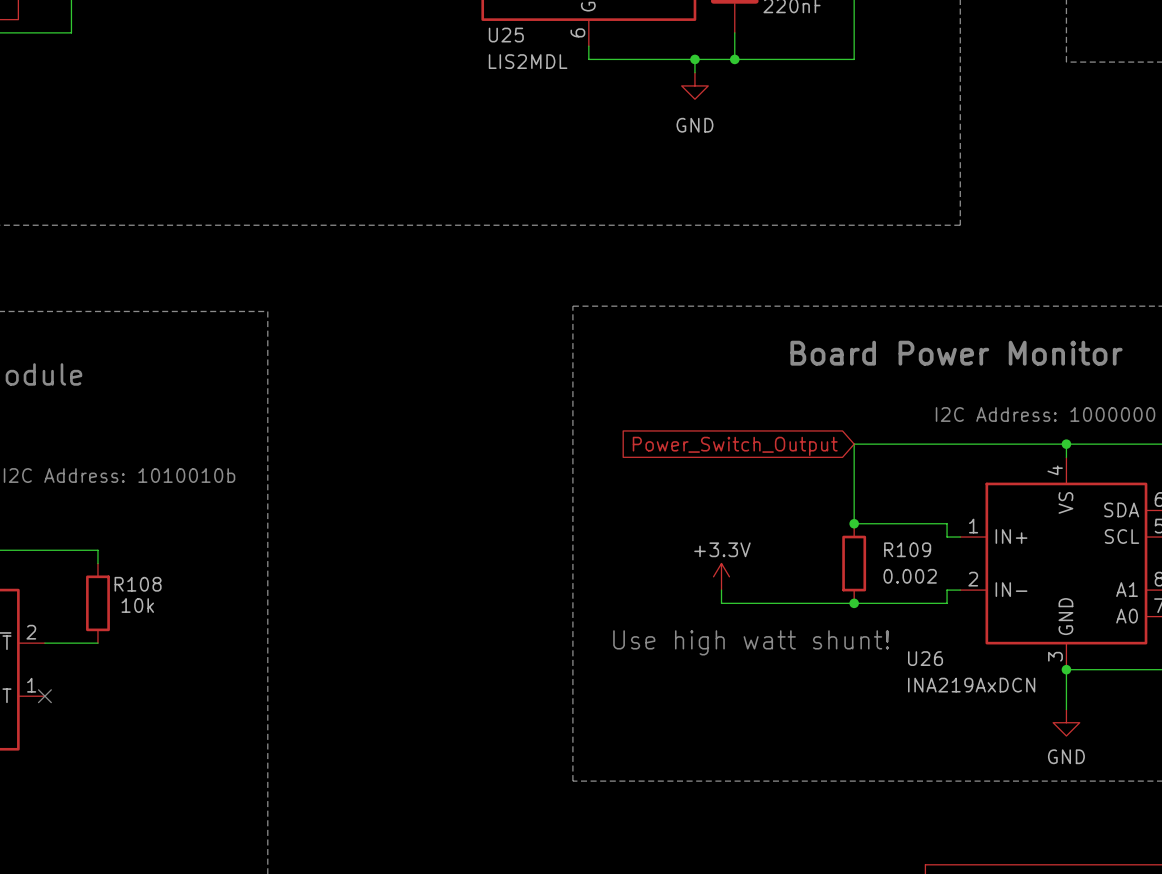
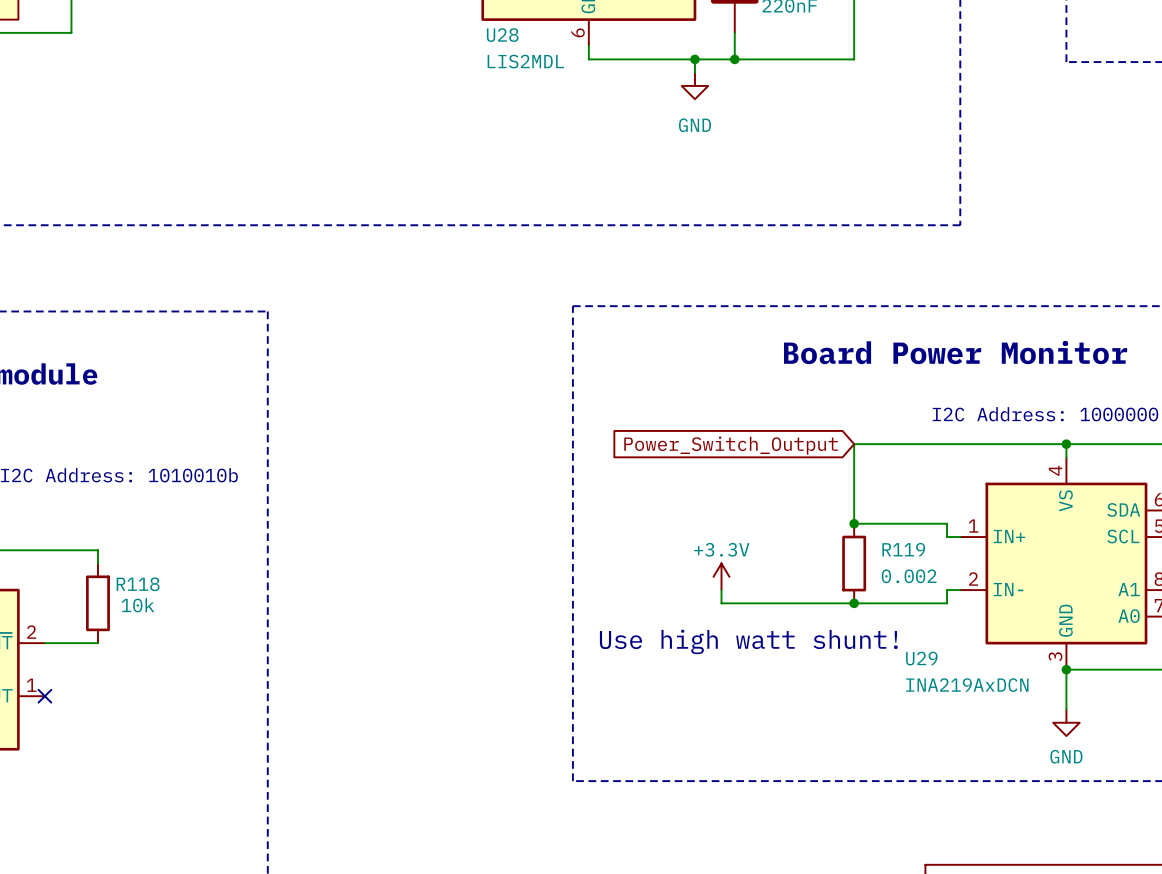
U25 name: U25 (506, 35) -> U28 (502, 35)
R109 name: R109 (907, 549) -> R119 (903, 549)
R108 name: R108 (138, 584) -> R118 (138, 584)
U26 name: U26 (925, 658) -> U29 (921, 658)

